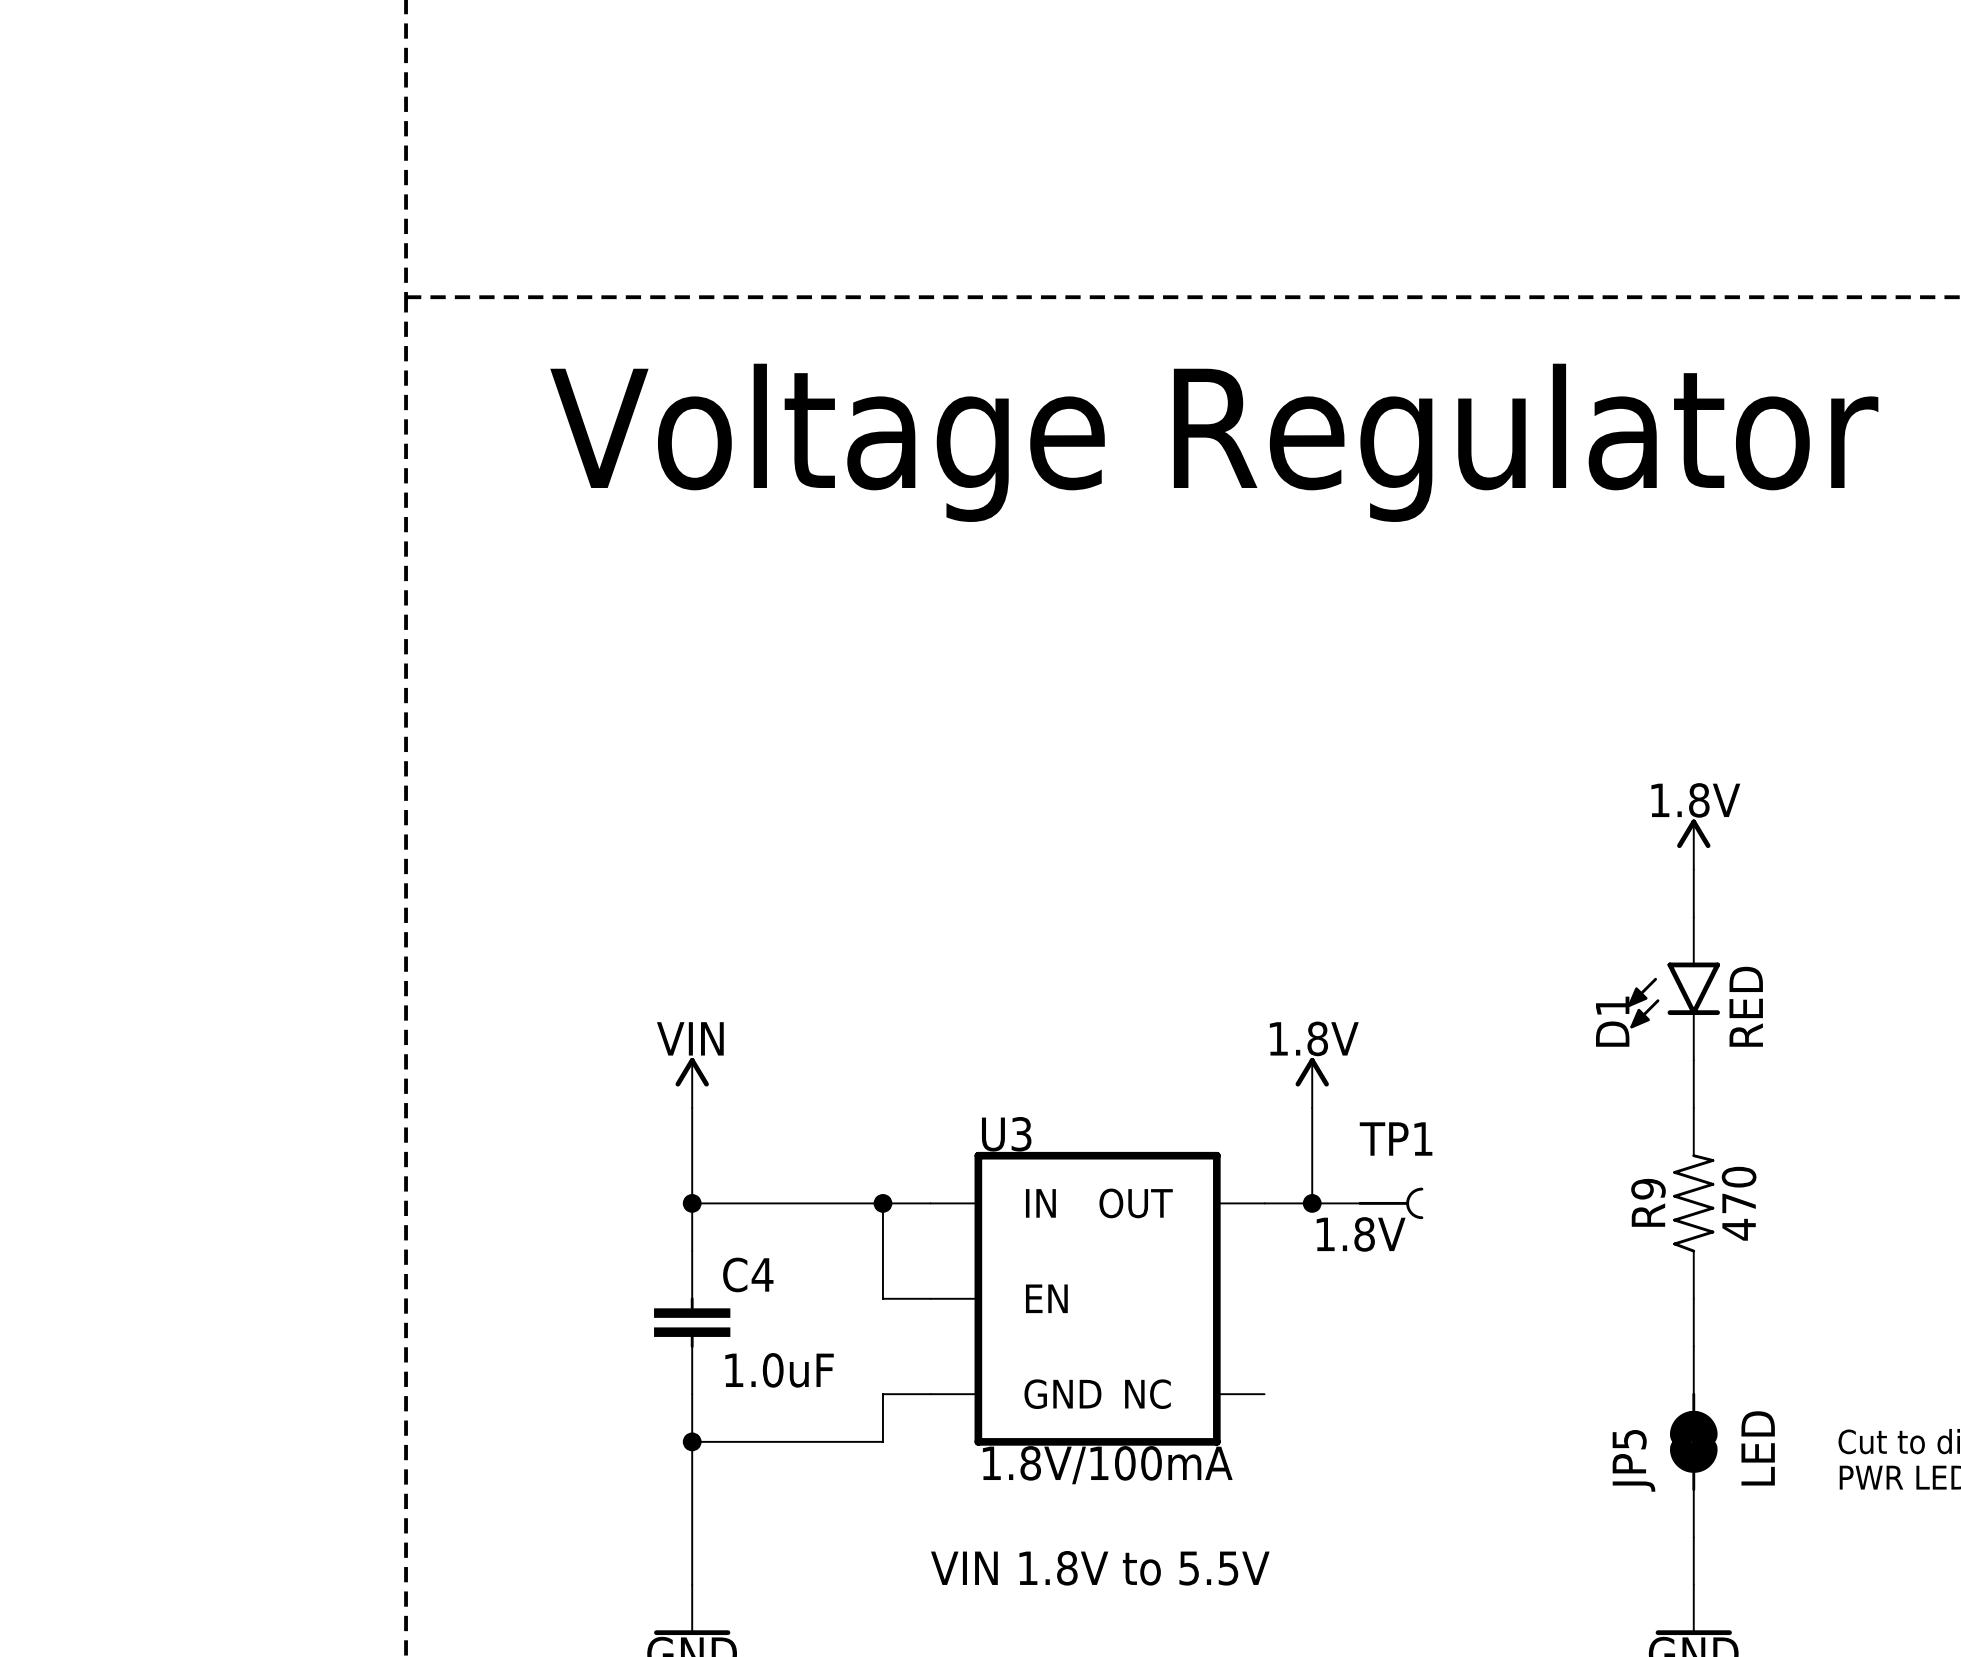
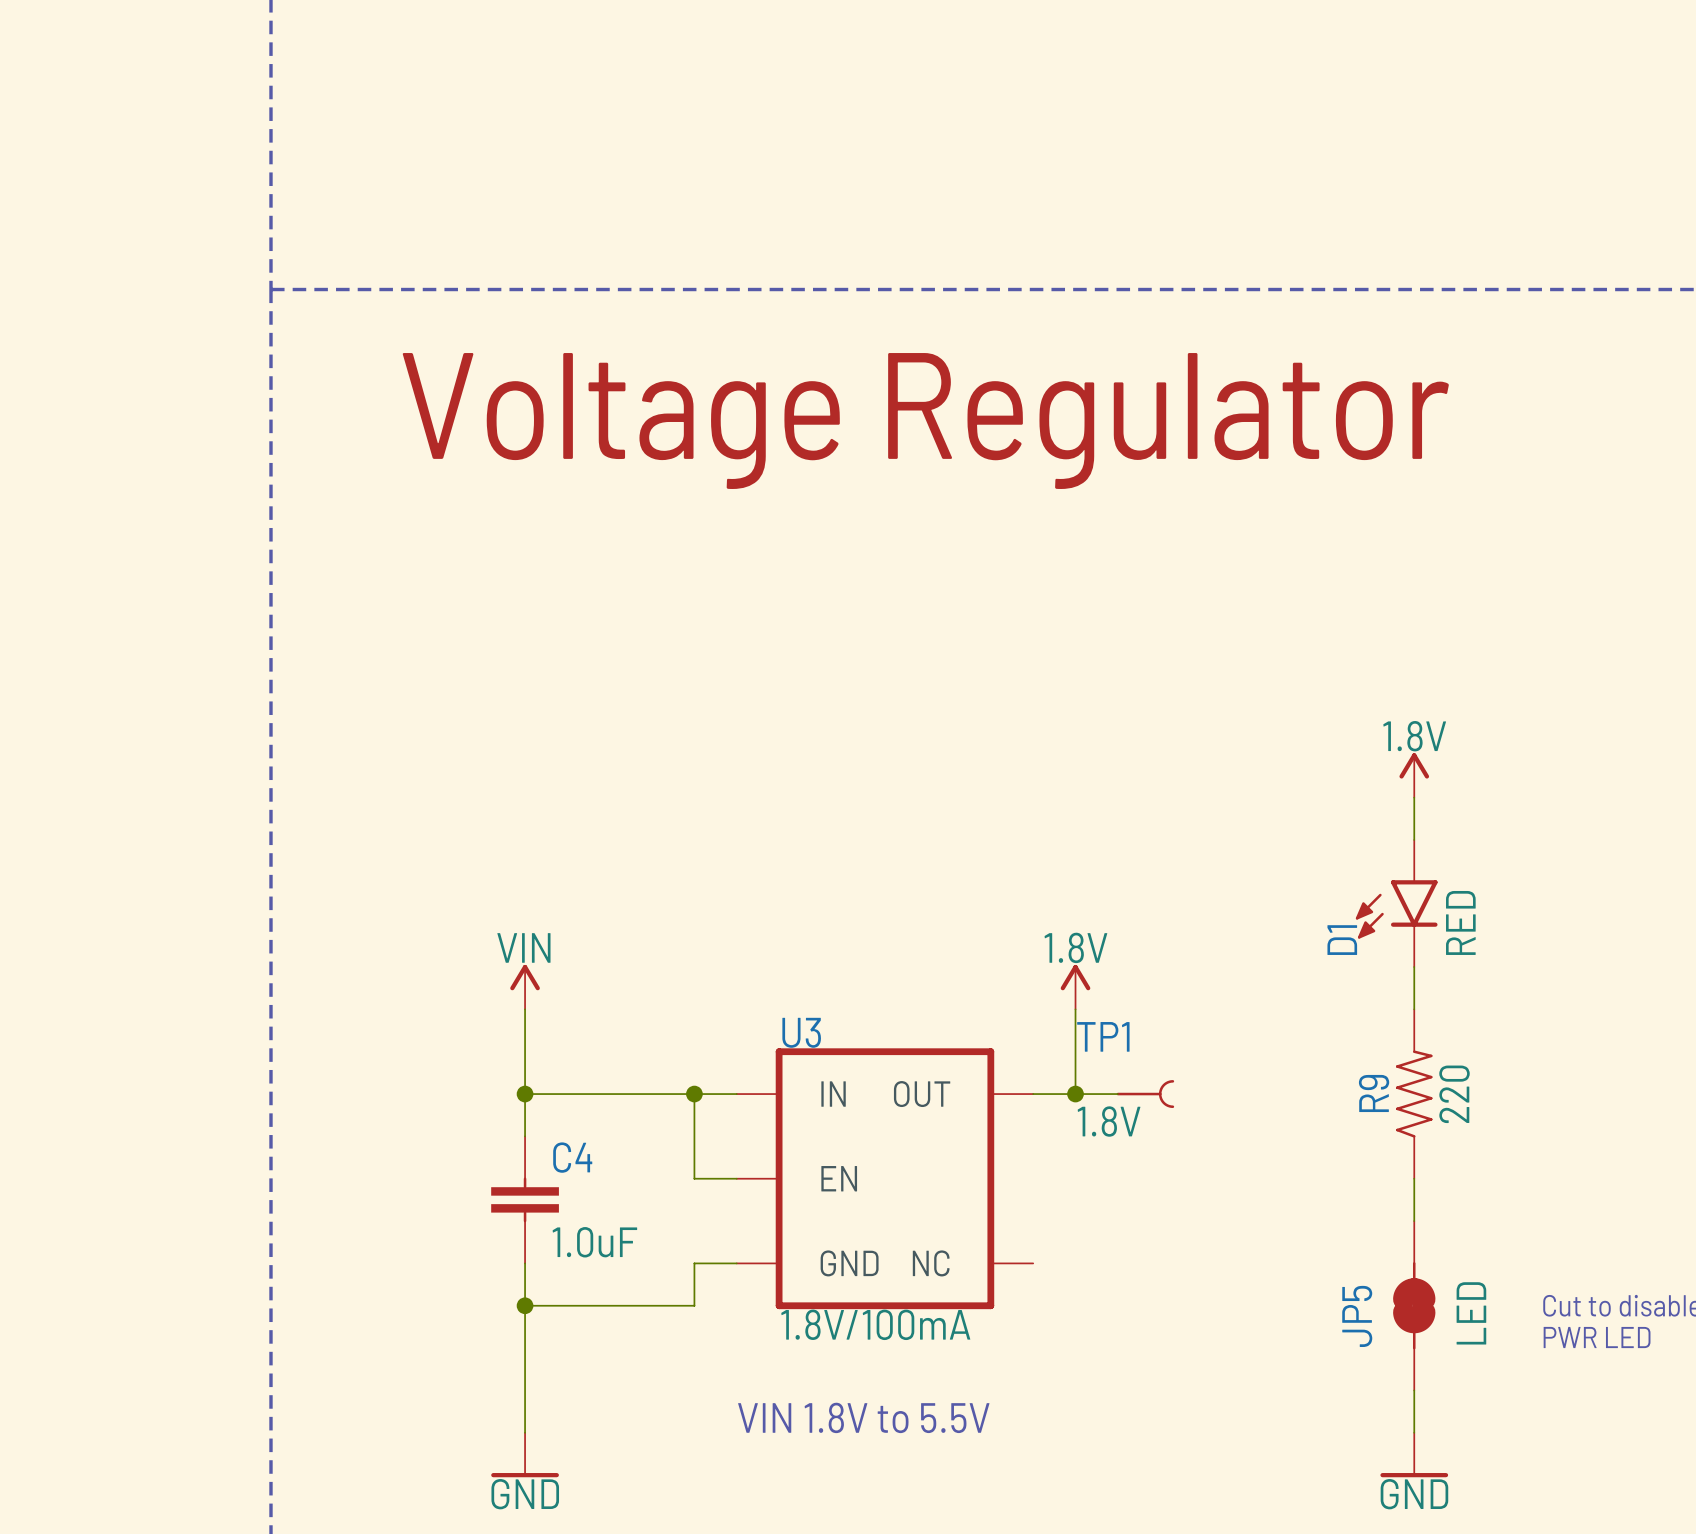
TP1 name position: TP1 (1396, 1139) -> TP1 (1103, 1036)
R9 value: 470 (1739, 1203) -> 220 (1454, 1094)

